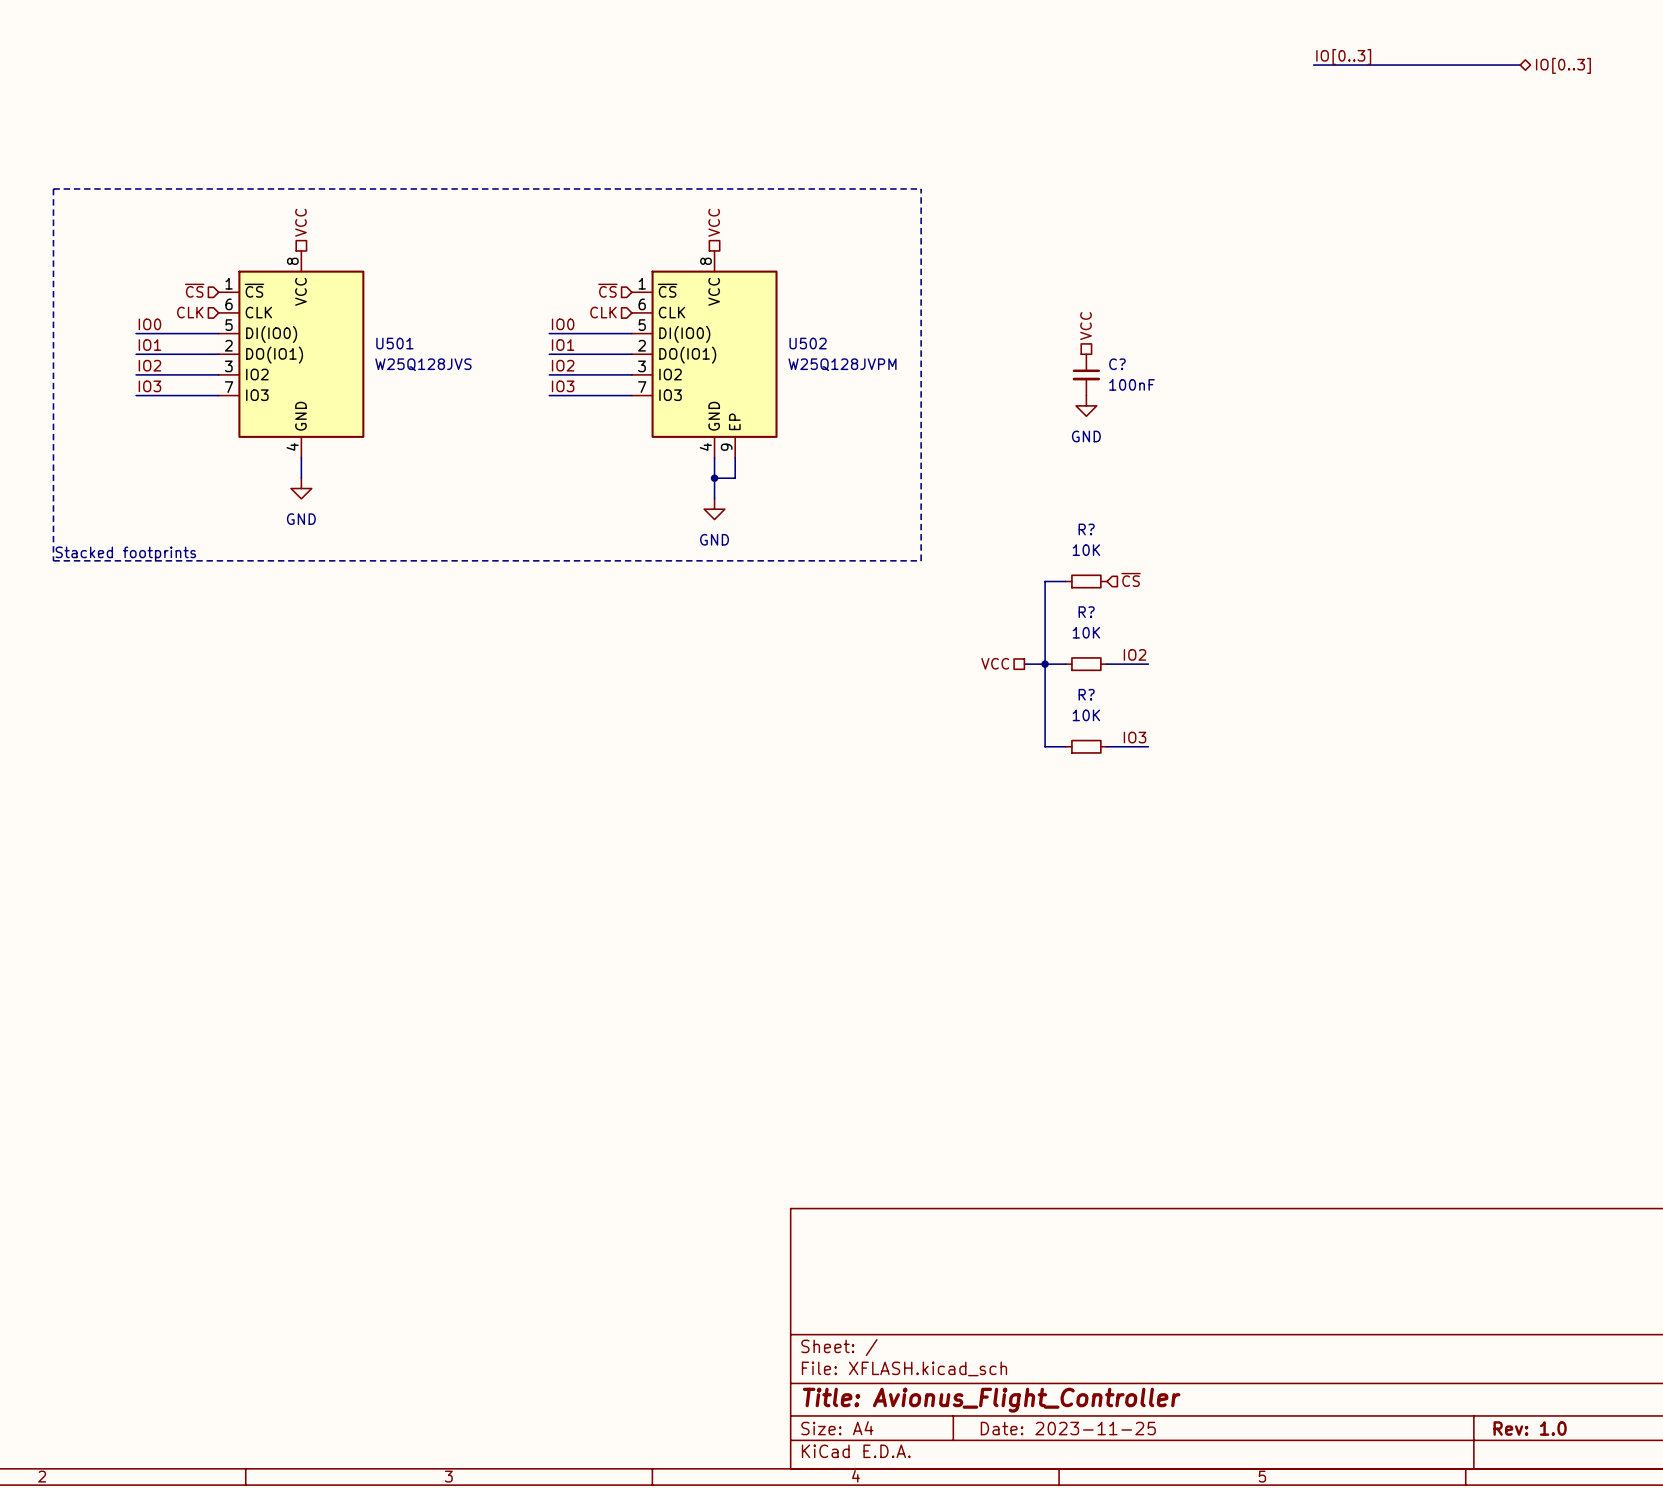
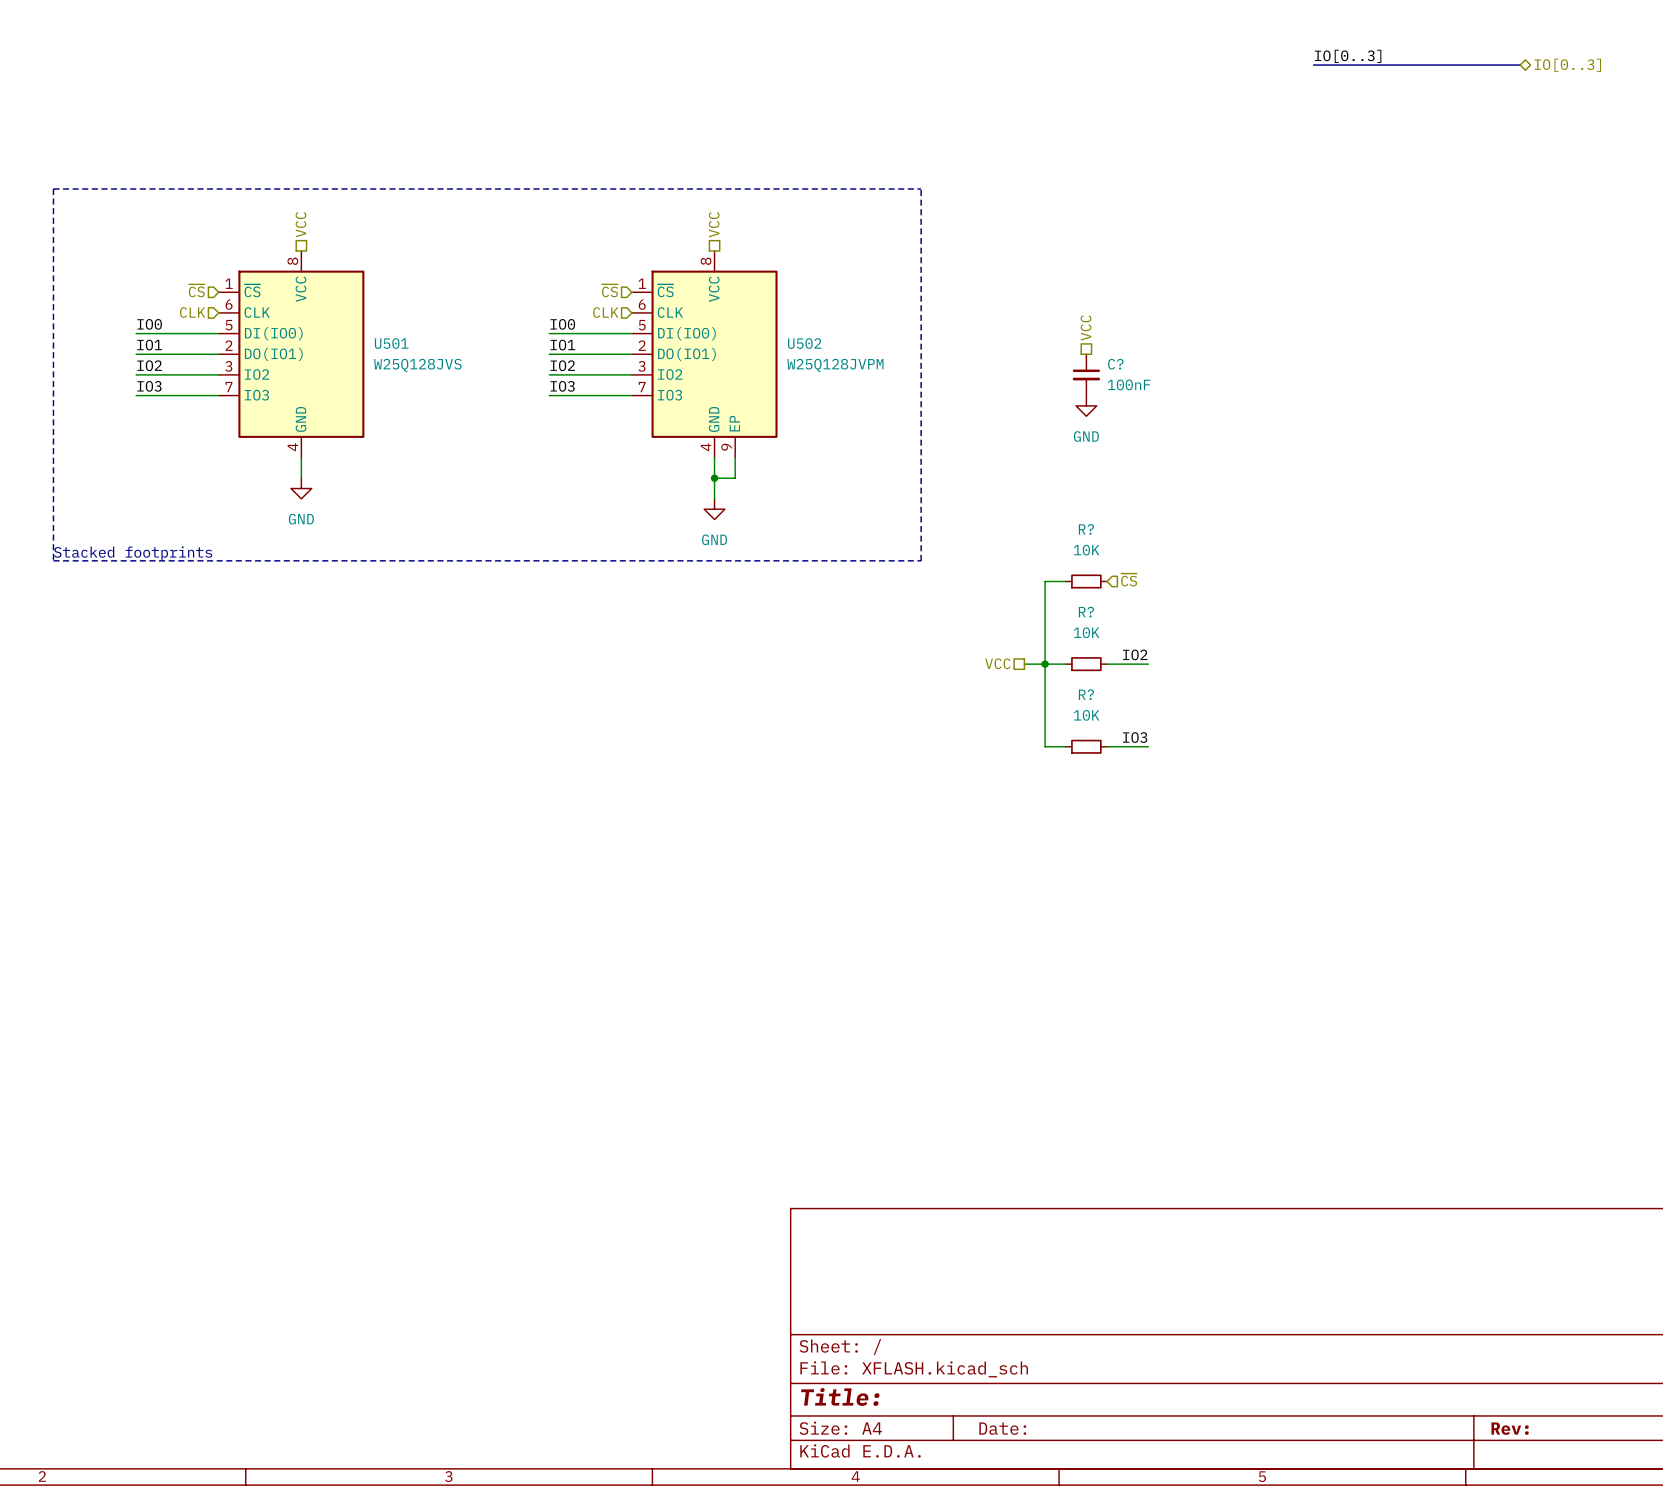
title block: Title: Avionus_Flight_Controller (991, 1400) -> Title: (840, 1396)
title block: Date: 2023-11-25 (1068, 1428) -> Date: (1002, 1428)
title block: Rev: 1.0 (1530, 1428) -> Rev: (1510, 1428)

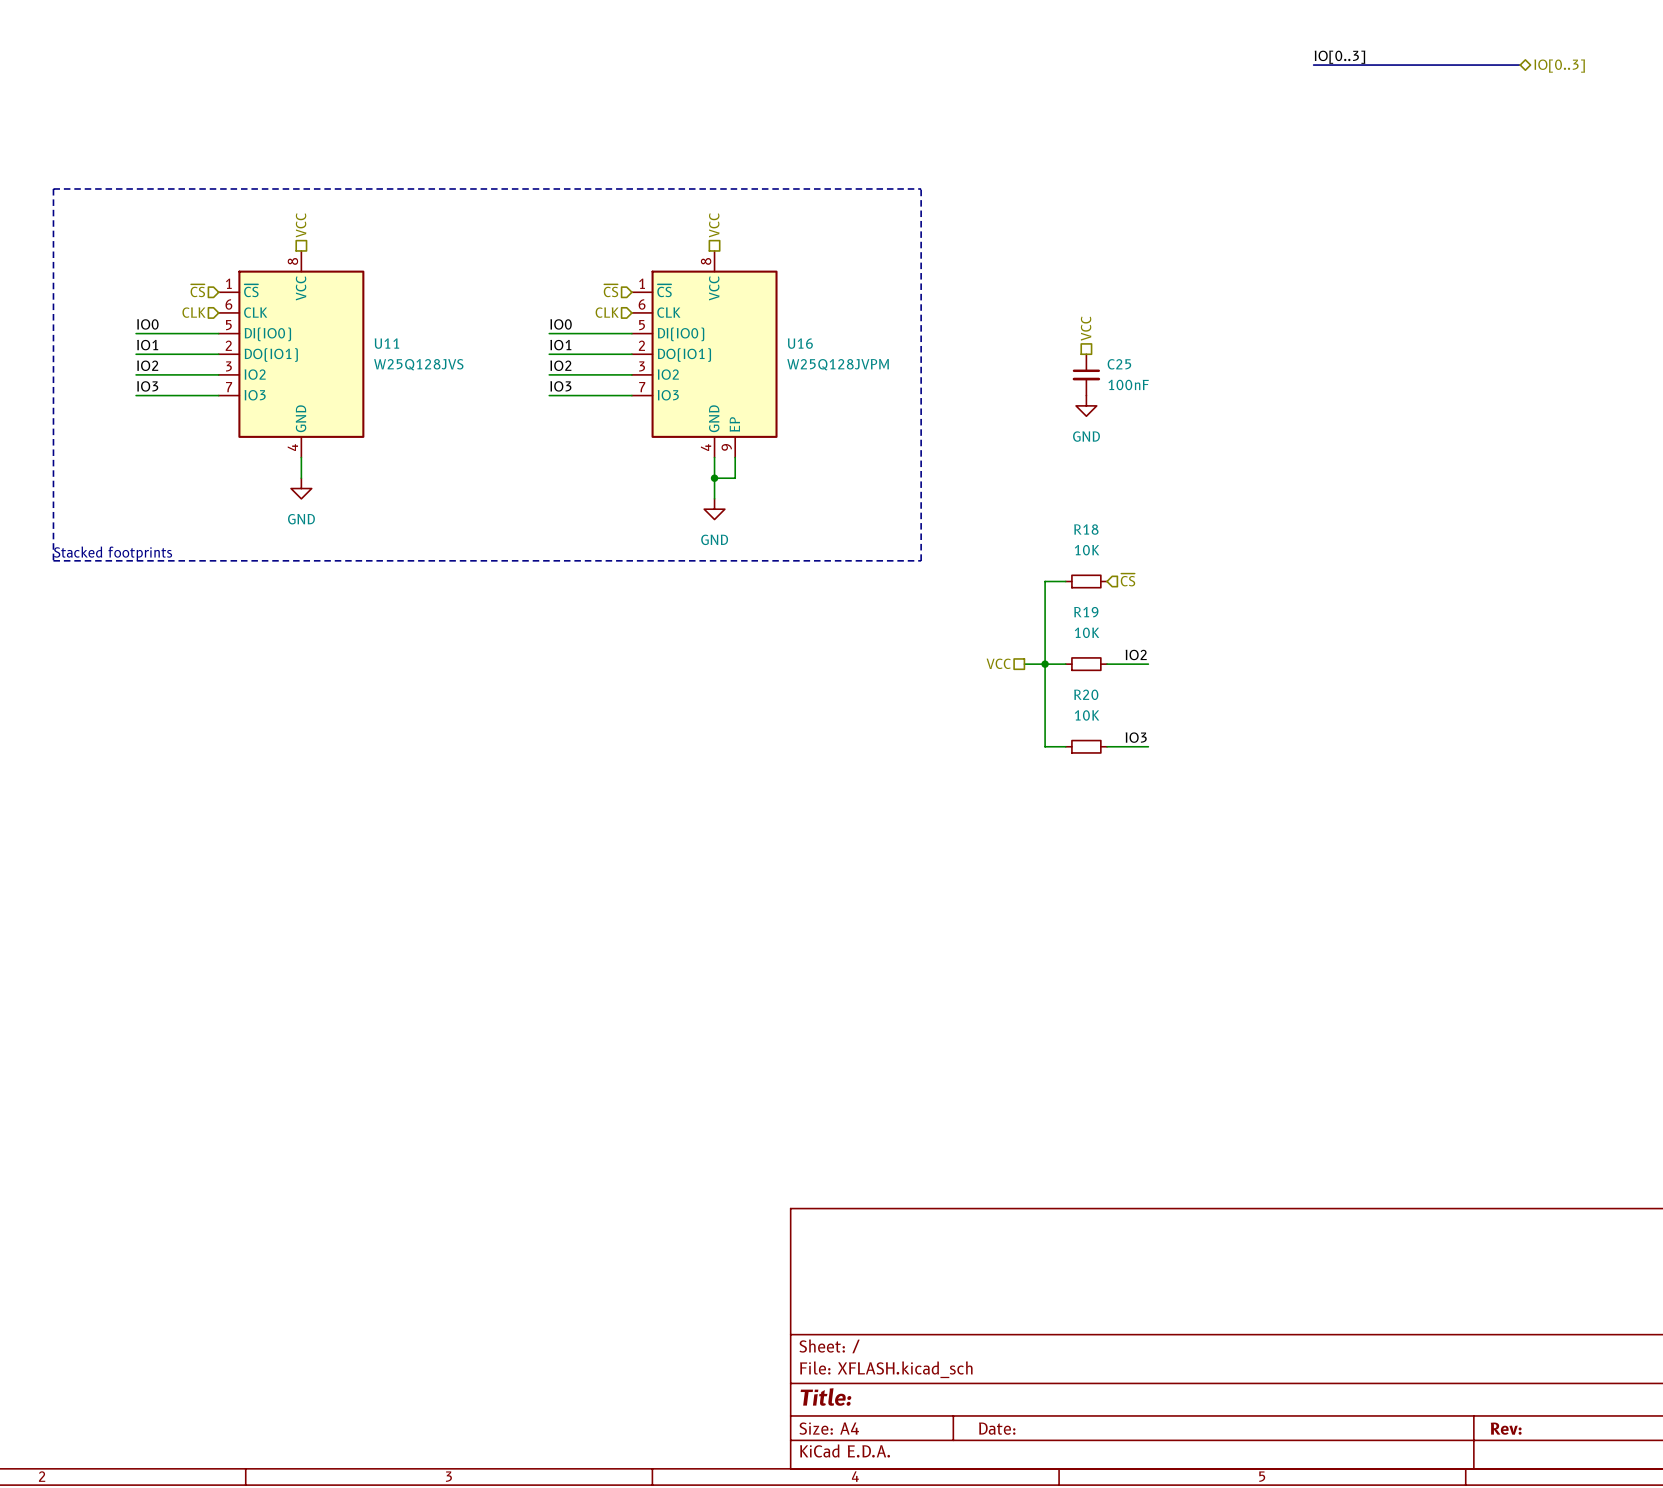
U501 name: U501 (391, 343) -> U11 (386, 343)
U502 name: U502 (804, 343) -> U16 (800, 343)
C? name: C? (1115, 364) -> C25 (1119, 364)
R? name: R? (1086, 529) -> R18 (1086, 529)
R? name: R? (1086, 612) -> R19 (1086, 612)
R? name: R? (1086, 694) -> R20 (1086, 694)

